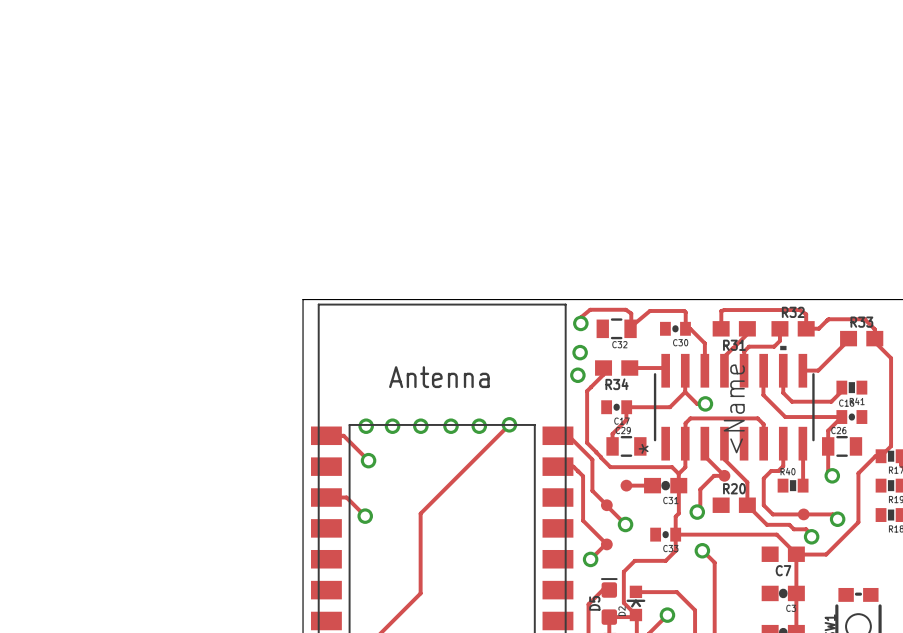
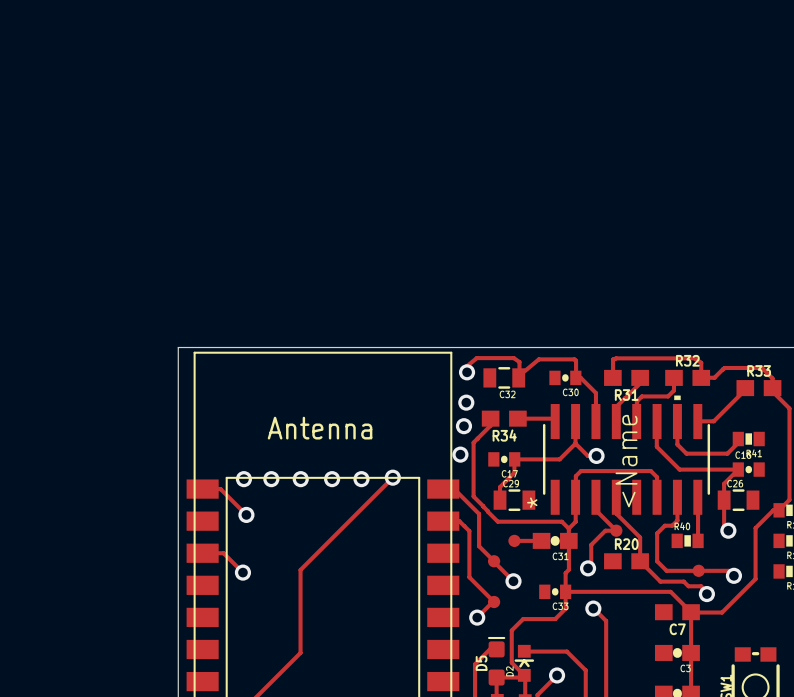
via: none -> (460, 454)

